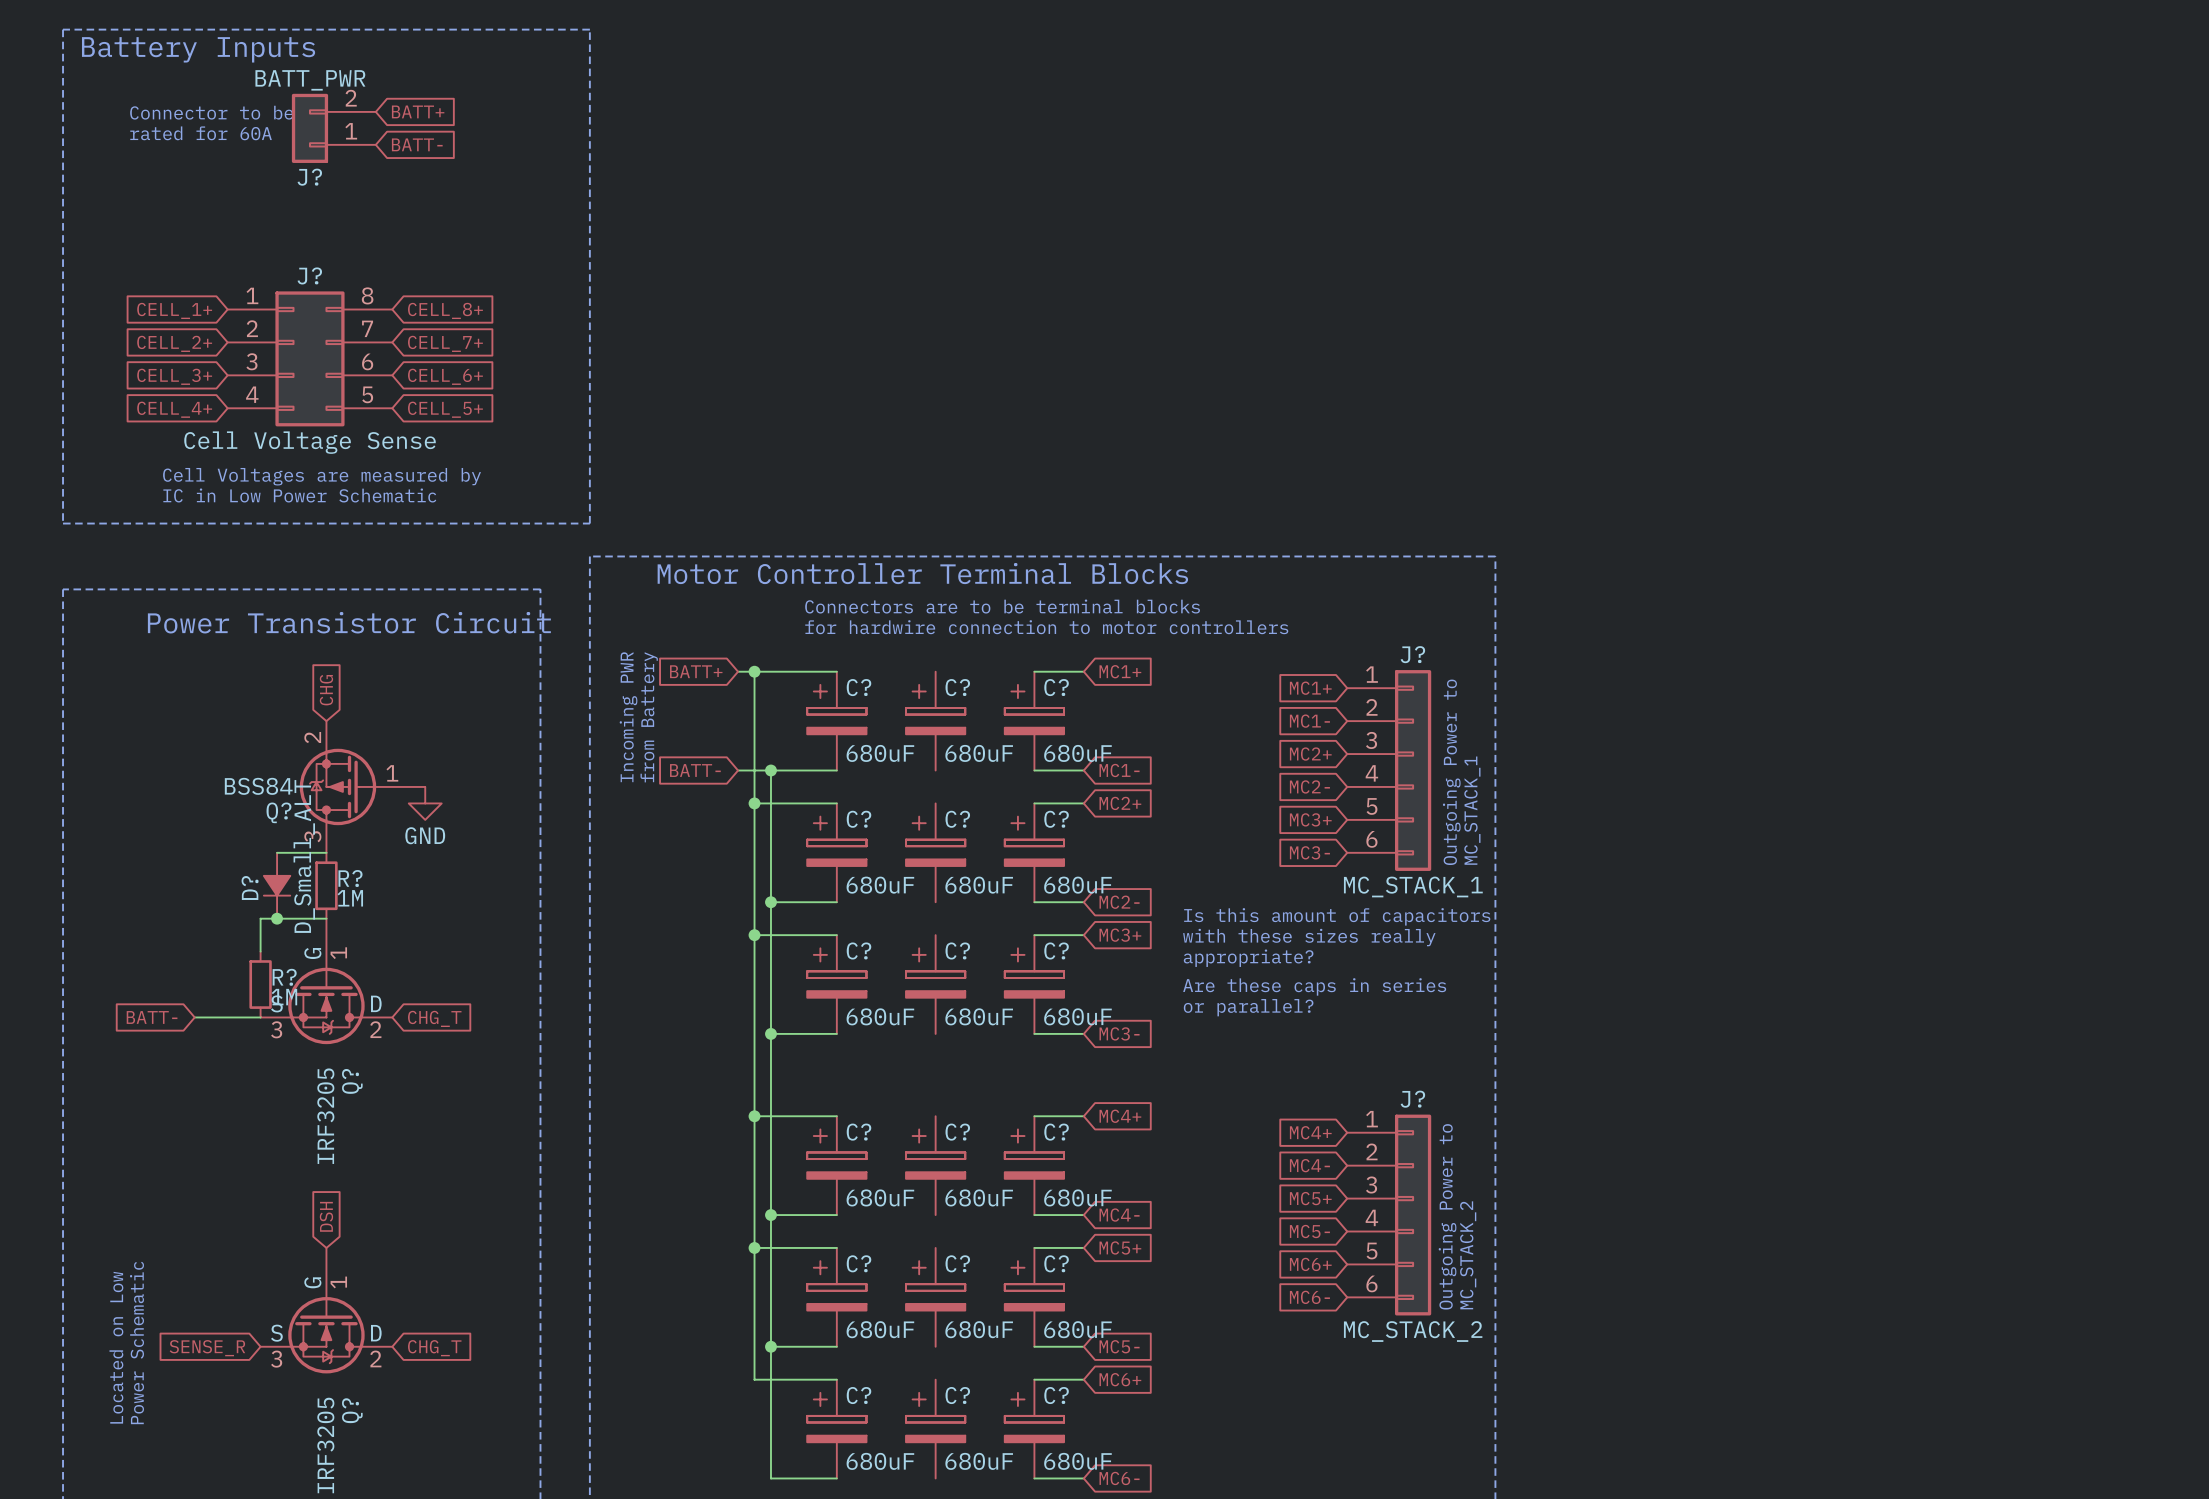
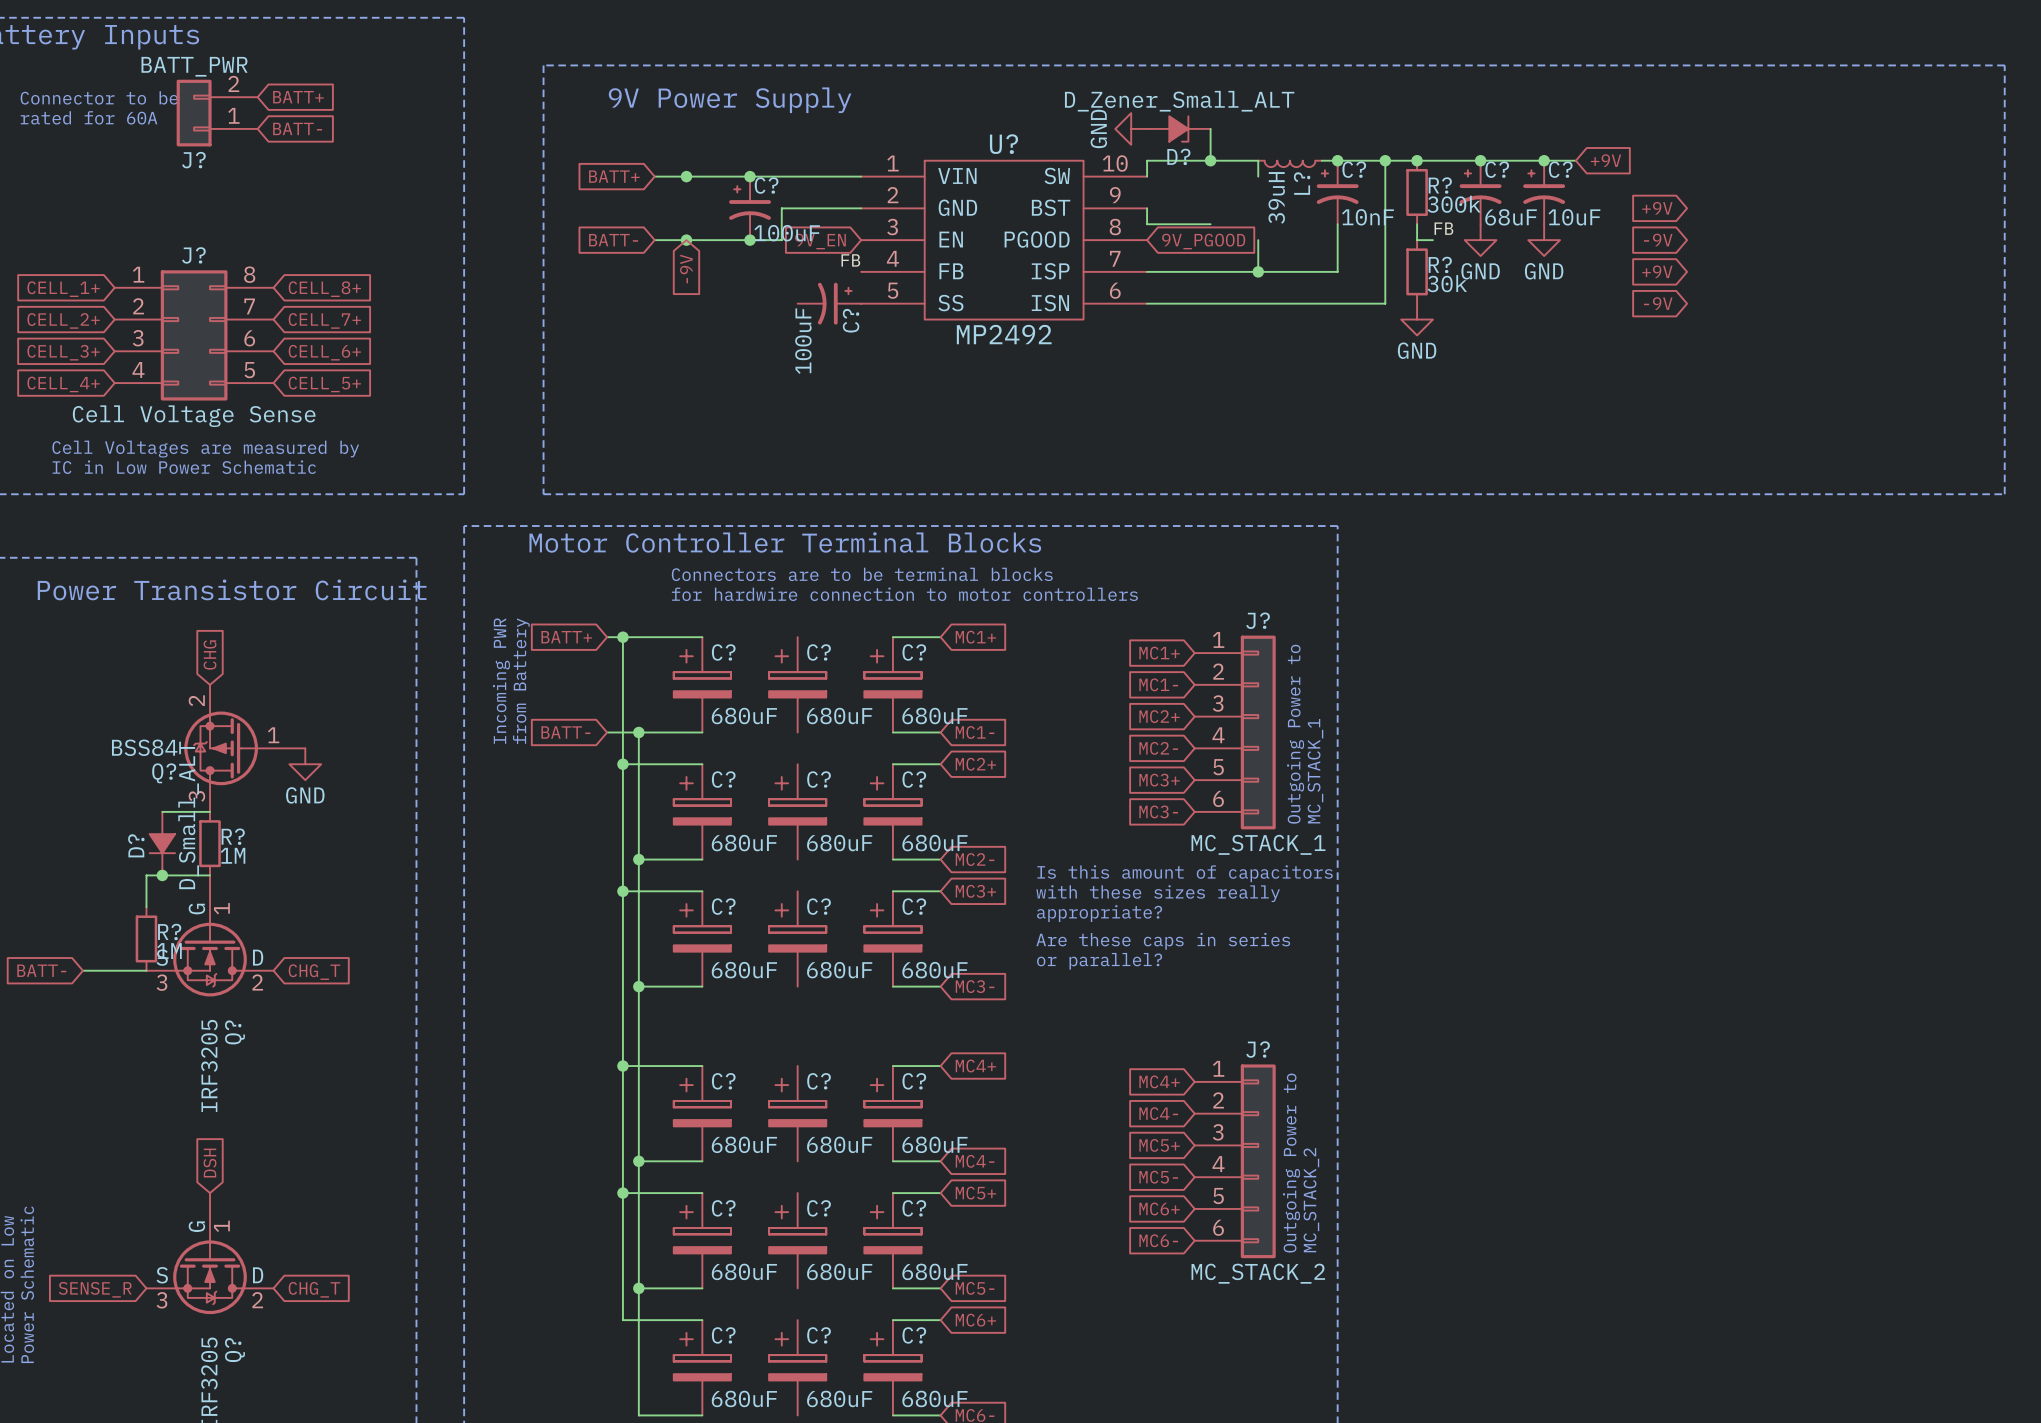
line: none -> (543, 65) (543, 494) (2004, 494) (2004, 65) (543, 65)
text: none -> 9V Power Supply (730, 100)
power symbol: none -> GND (1131, 128)
D?: none -> D_Zener_Small_ALT (1178, 128)
wire: none -> (1210, 128) (1210, 160)
junction: none -> (1210, 160)
wire: none -> (1321, 160) (1575, 160)
junction: none -> (1337, 160)
wire: none -> (1385, 160) (1385, 303) (1147, 303)
junction: none -> (1385, 160)
junction: none -> (1417, 160)
junction: none -> (1480, 160)
junction: none -> (1544, 160)
global label: none -> +9V (1606, 160)
L?: none -> 39uH (1290, 163)
global label: none -> BATT+ (614, 176)
wire: none -> (654, 176) (861, 176)
junction: none -> (686, 176)
junction: none -> (750, 176)
wire: none -> (1147, 176) (1147, 160) (1258, 160) (1258, 176)
C?: none -> 10nF (1337, 192)
R?: none -> 300k (1417, 192)
C?: none -> 68uF (1480, 192)
C?: none -> 10uF (1544, 192)
C?: none -> 100uF (750, 208)
wire: none -> (861, 208) (781, 208) (781, 240) (654, 240)
wire: none -> (1147, 208) (1147, 224) (1210, 224)
global label: none -> +9V (1657, 208)
wire: none -> (1337, 224) (1337, 271) (1147, 271)
wire: none -> (1417, 224) (1417, 240) (1432, 240)
label: none -> FB (1443, 228)
global label: none -> BATT- (613, 240)
junction: none -> (686, 240)
junction: none -> (750, 240)
U?: none -> MP2492 (1004, 240)
wire: none -> (1258, 240) (1258, 271)
power symbol: none -> GND (1480, 240)
power symbol: none -> GND (1544, 240)
global label: none -> -9V (1658, 240)
global label: none -> 9V_EN (820, 241)
global label: none -> 9V_PGOOD (1203, 241)
label: none -> FB (850, 260)
global label: none -> -9V (686, 268)
global label: none -> +9V (1657, 271)
junction: none -> (1258, 271)
R?: none -> 30k (1417, 271)
C?: none -> 100uF (829, 303)
global label: none -> -9V (1658, 303)
power symbol: none -> GND (1417, 319)

